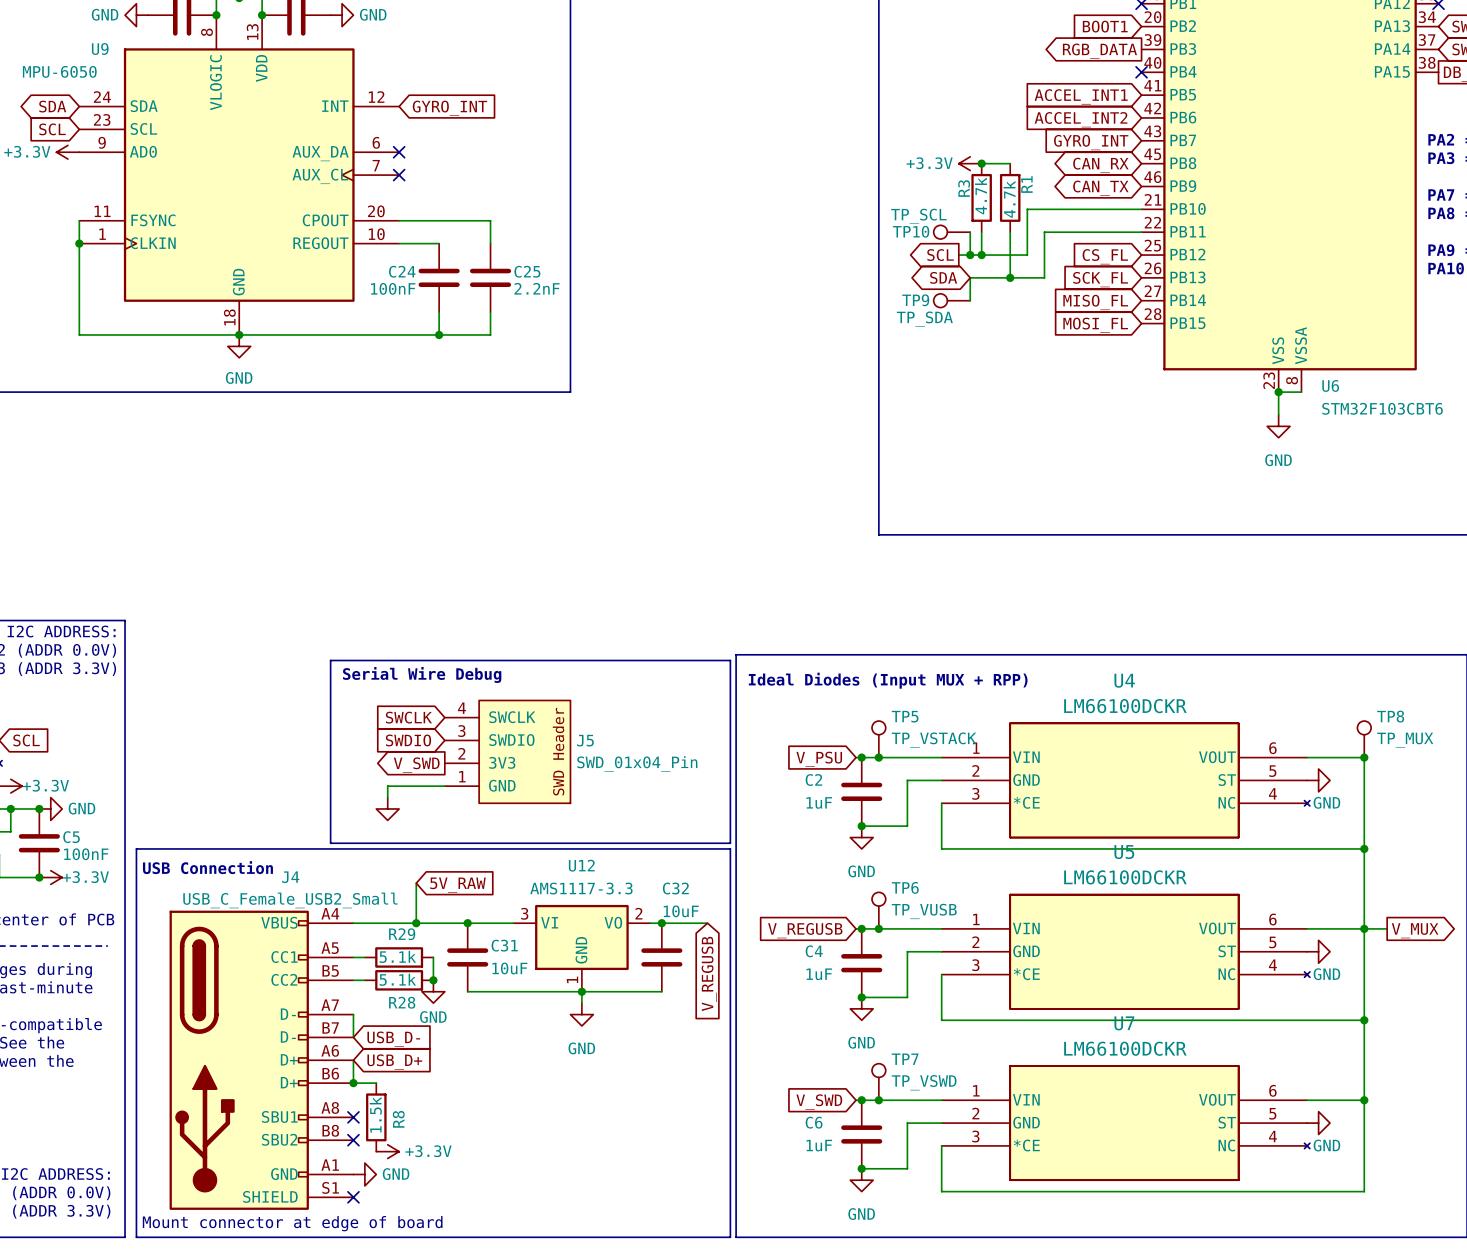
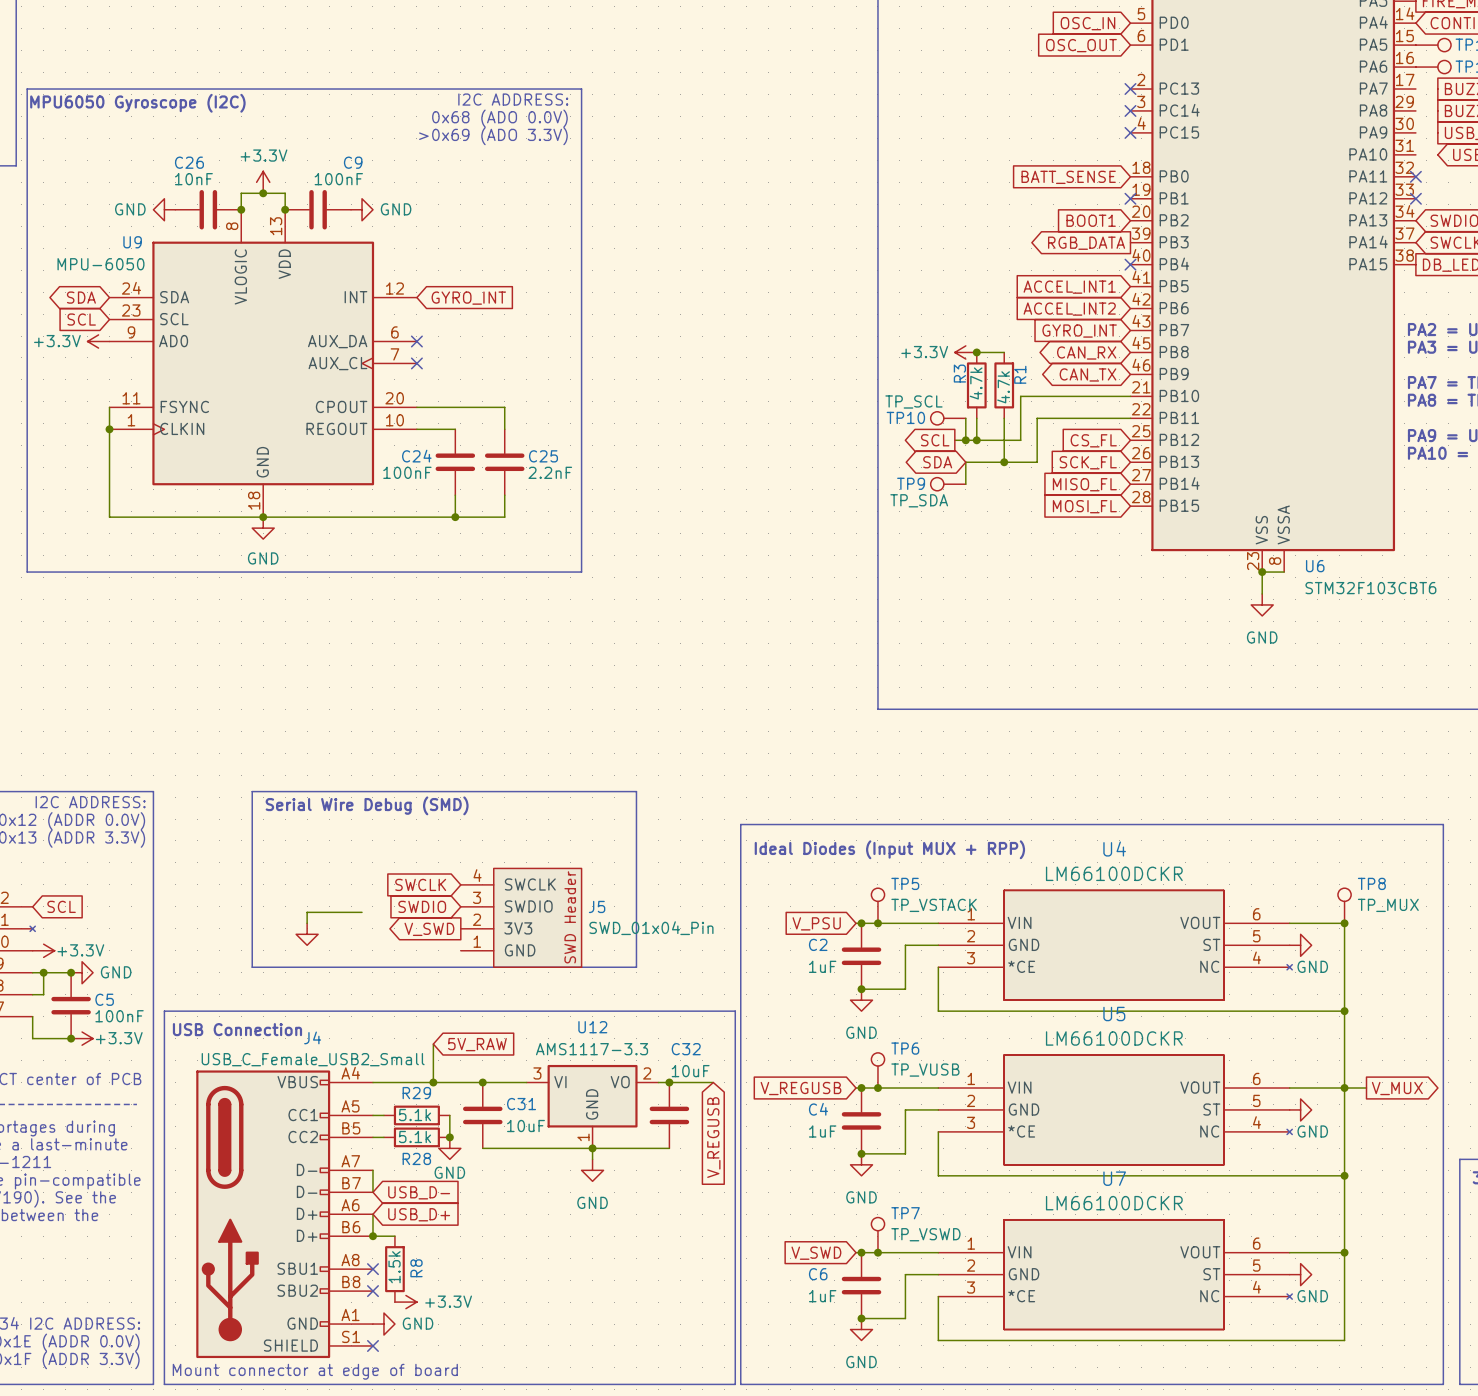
text: none -> Serial Wire Debug (SMD) (367, 805)
line: (330, 660) (730, 660) (730, 843) (330, 843) (330, 660) -> (252, 791) (636, 791) (636, 967) (252, 967) (252, 791)
text: Serial Wire Debug (422, 674) -> none
wire: (444, 786) (387, 786) (387, 797) -> (362, 912) (307, 912) (307, 923)
power symbol position: (387, 808) -> (307, 934)

